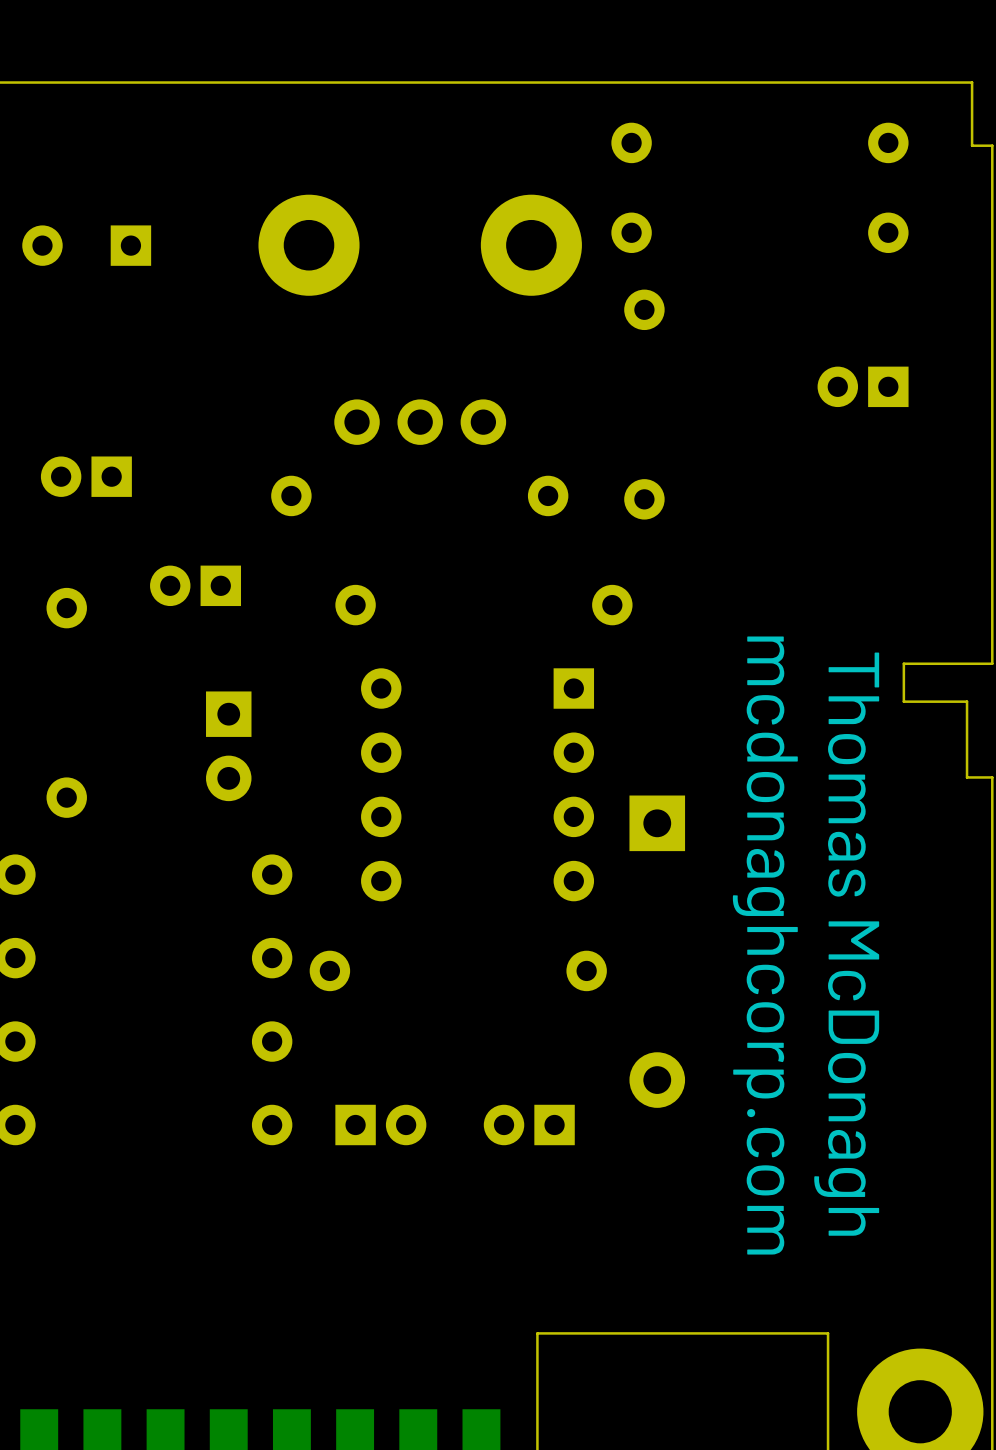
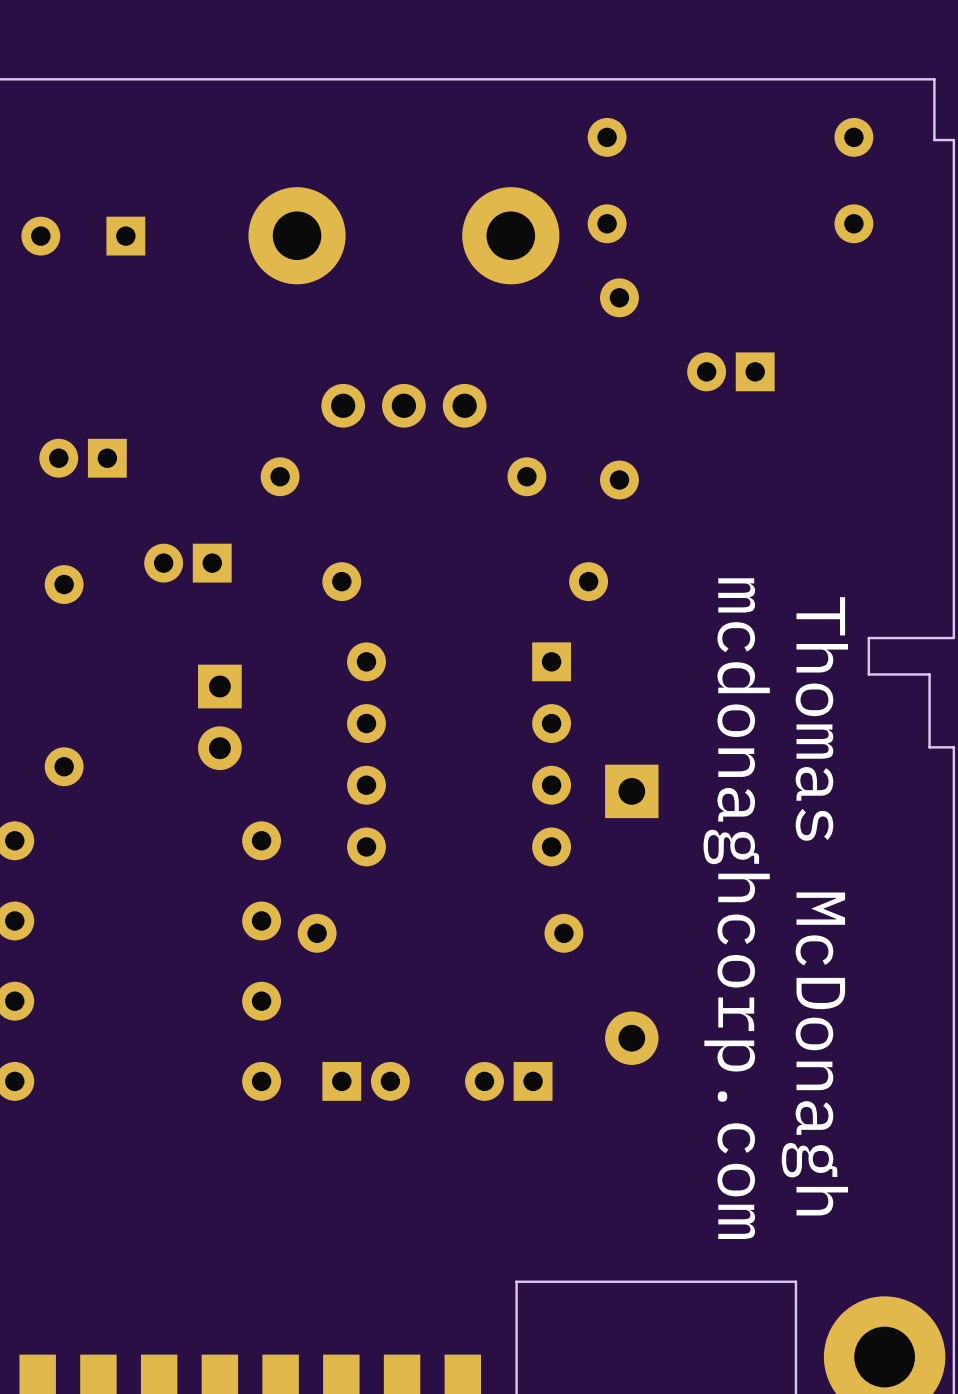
part position: (863, 386) -> (730, 371)

